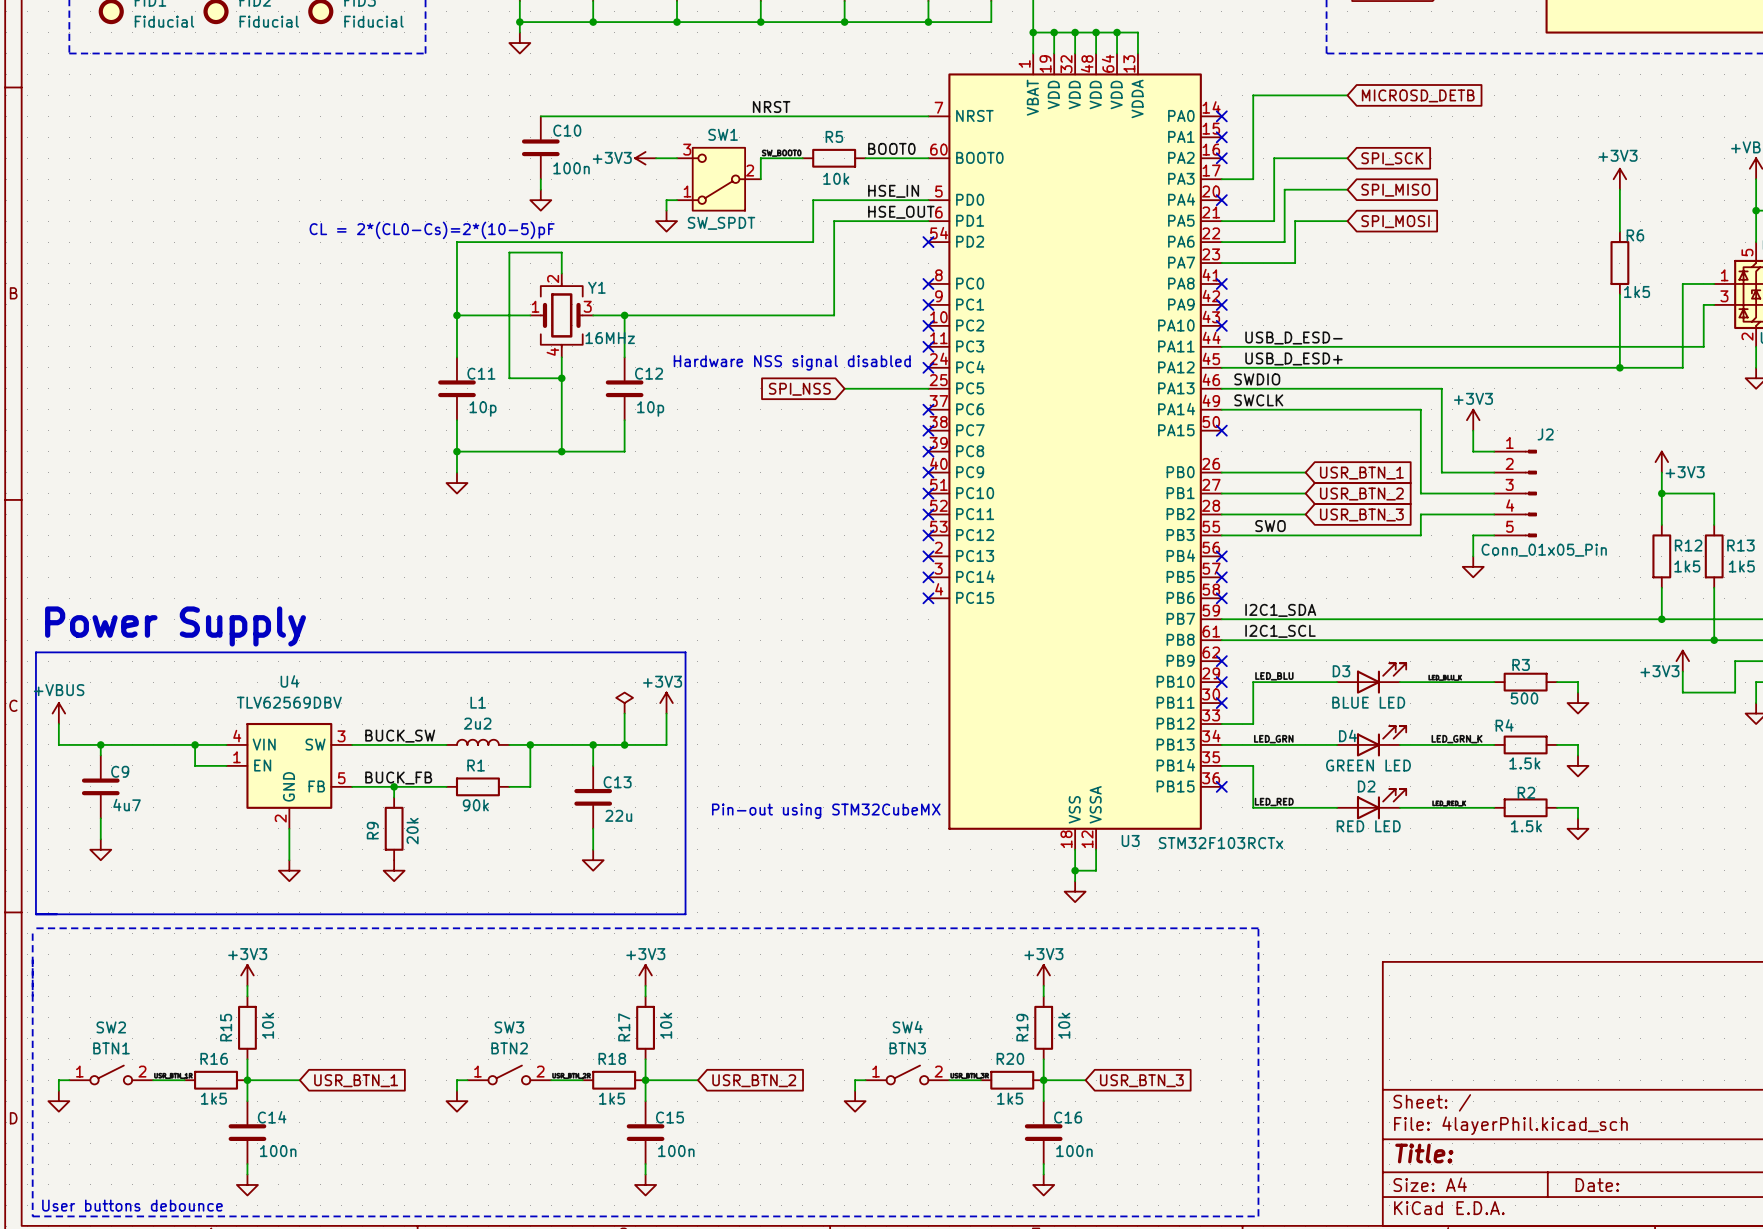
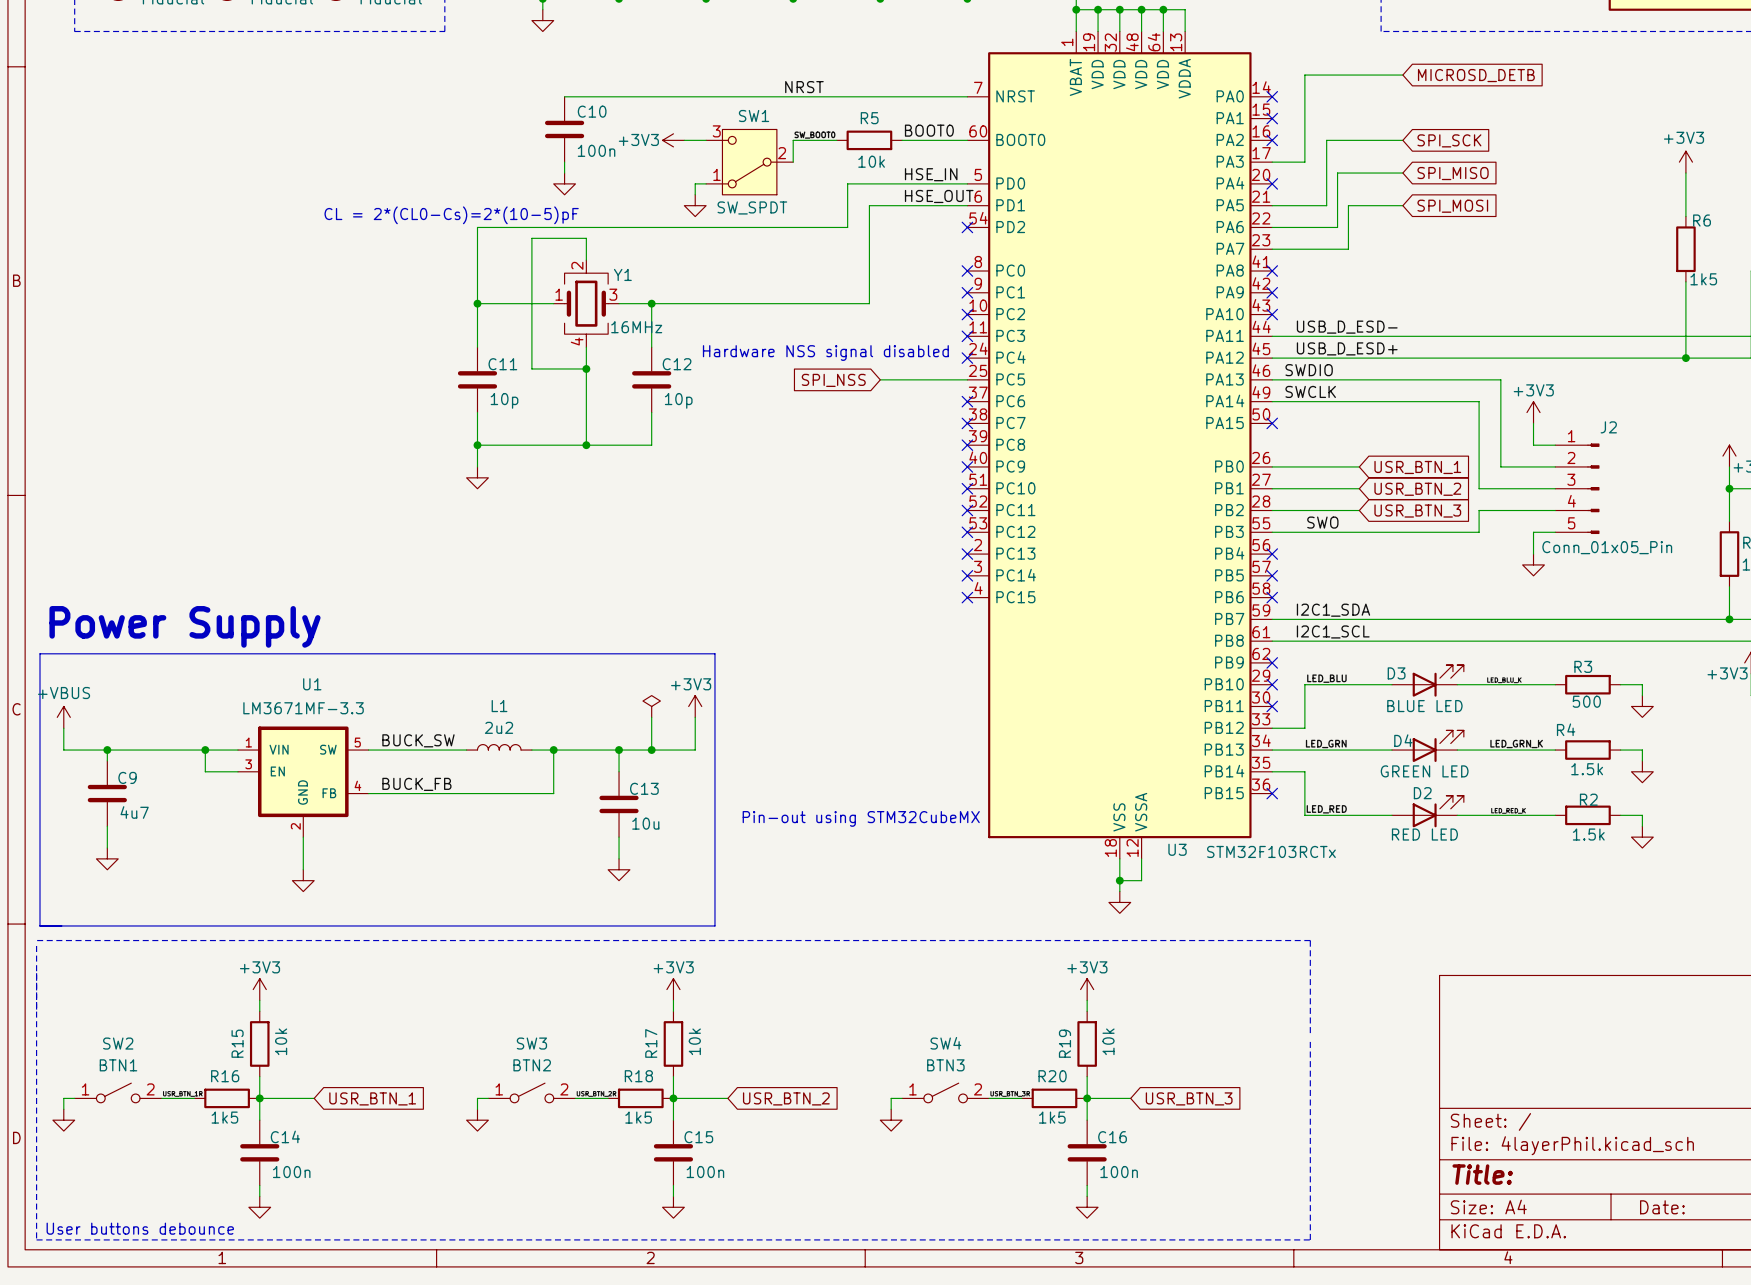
U4: TLV62569DBV (289, 775) -> none
U1: none -> LM3671MF-3.3 (303, 781)
wire: (394, 786) (394, 797) -> none
junction: (394, 786) -> none
wire: none -> (466, 793) (531, 793)
R1: 90k (477, 786) -> none
C13 value: 22u (618, 815) -> 10u (645, 823)
R9: 20k (394, 828) -> none
power symbol: (394, 870) -> none

